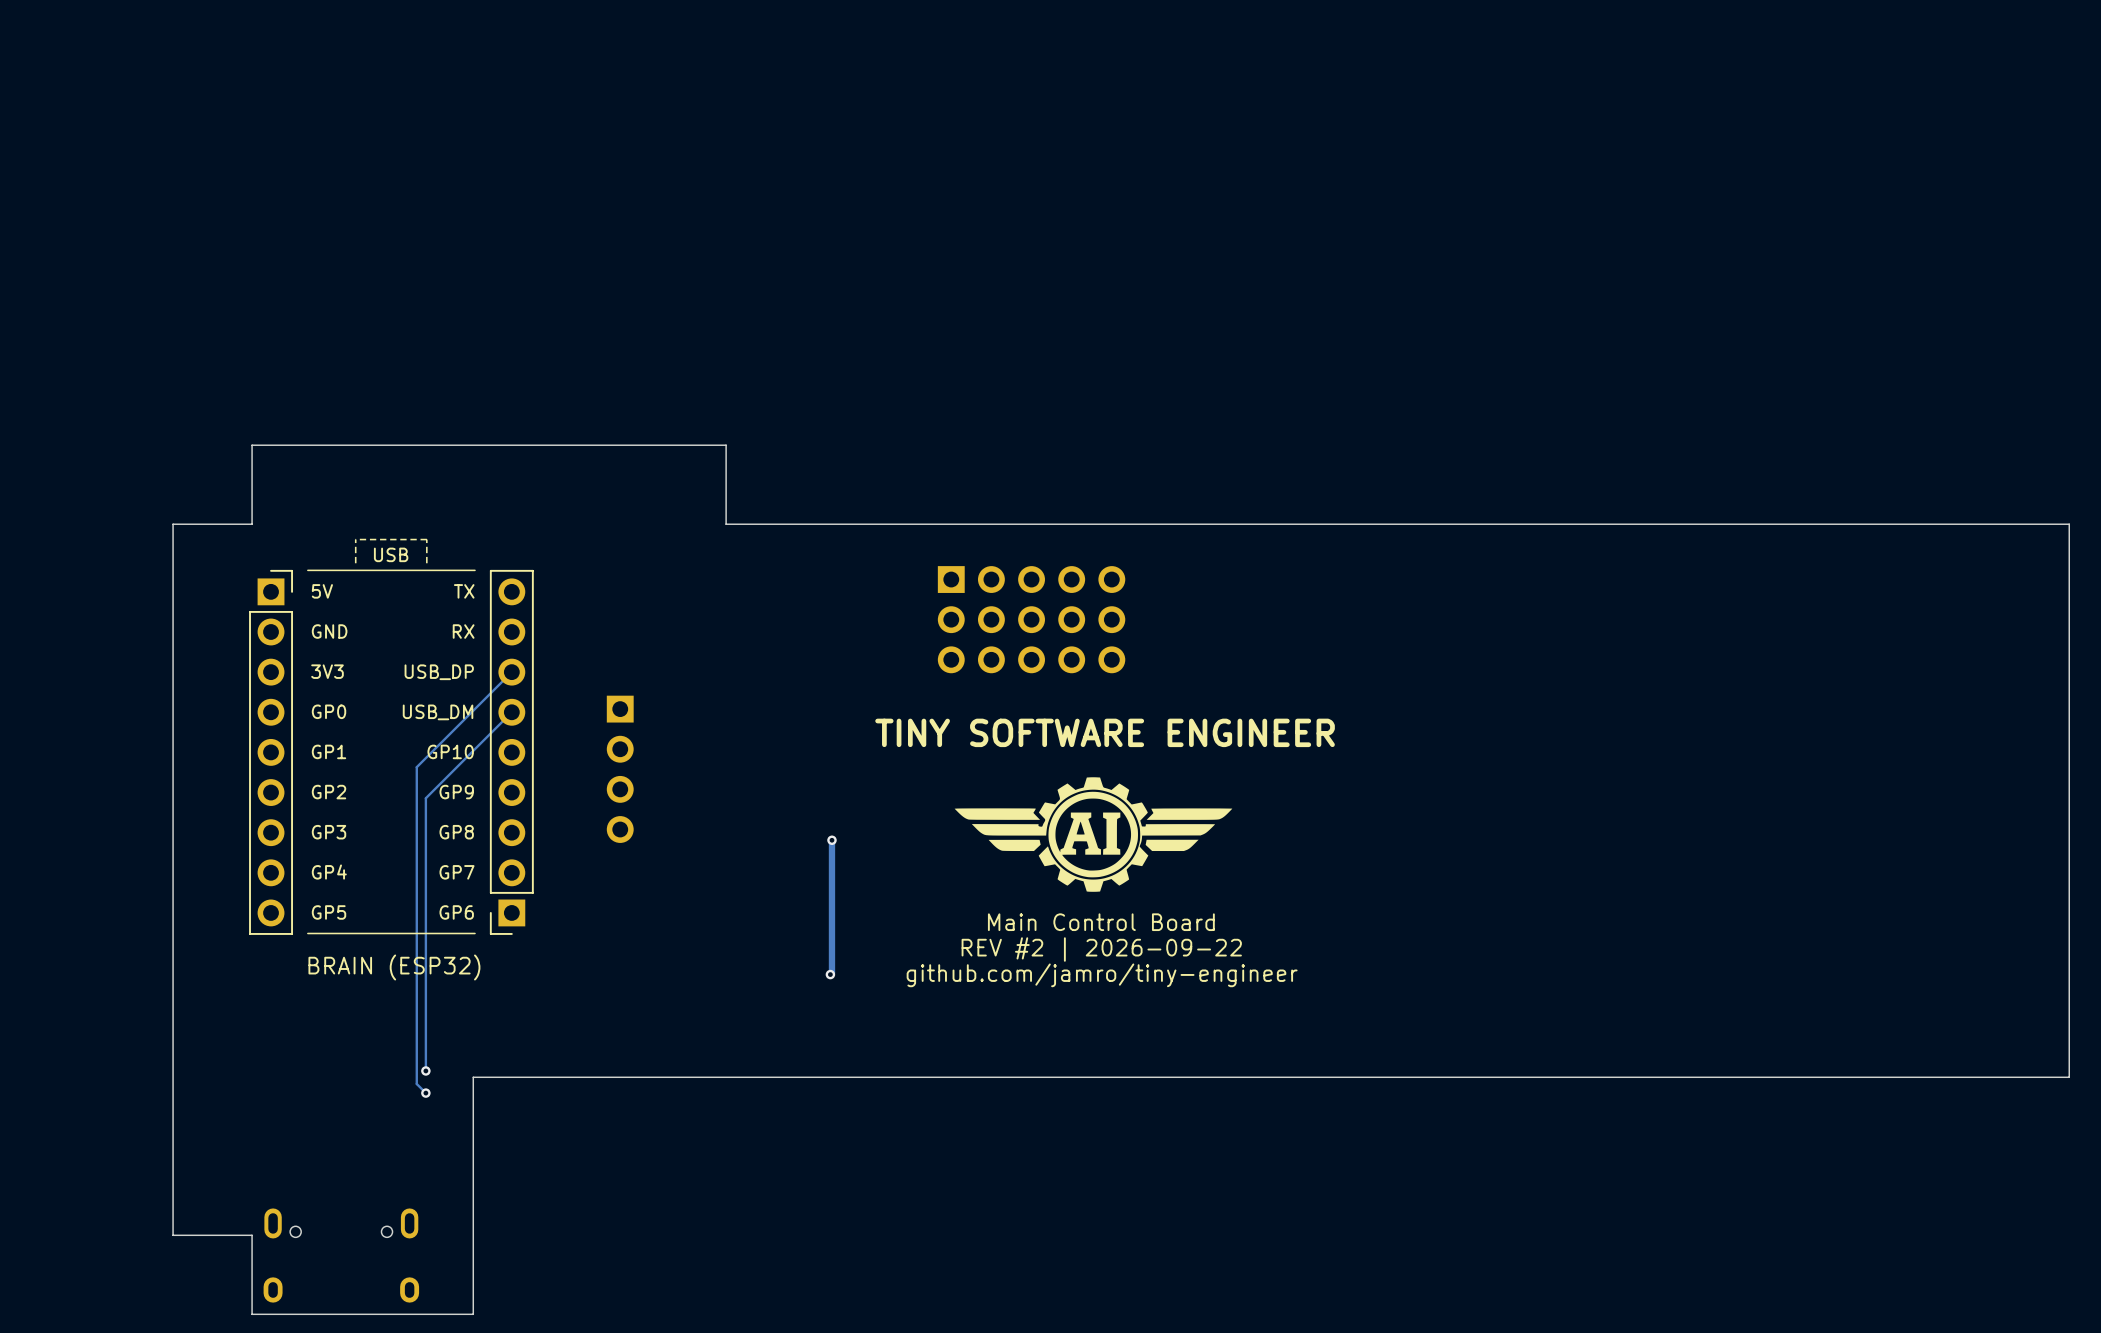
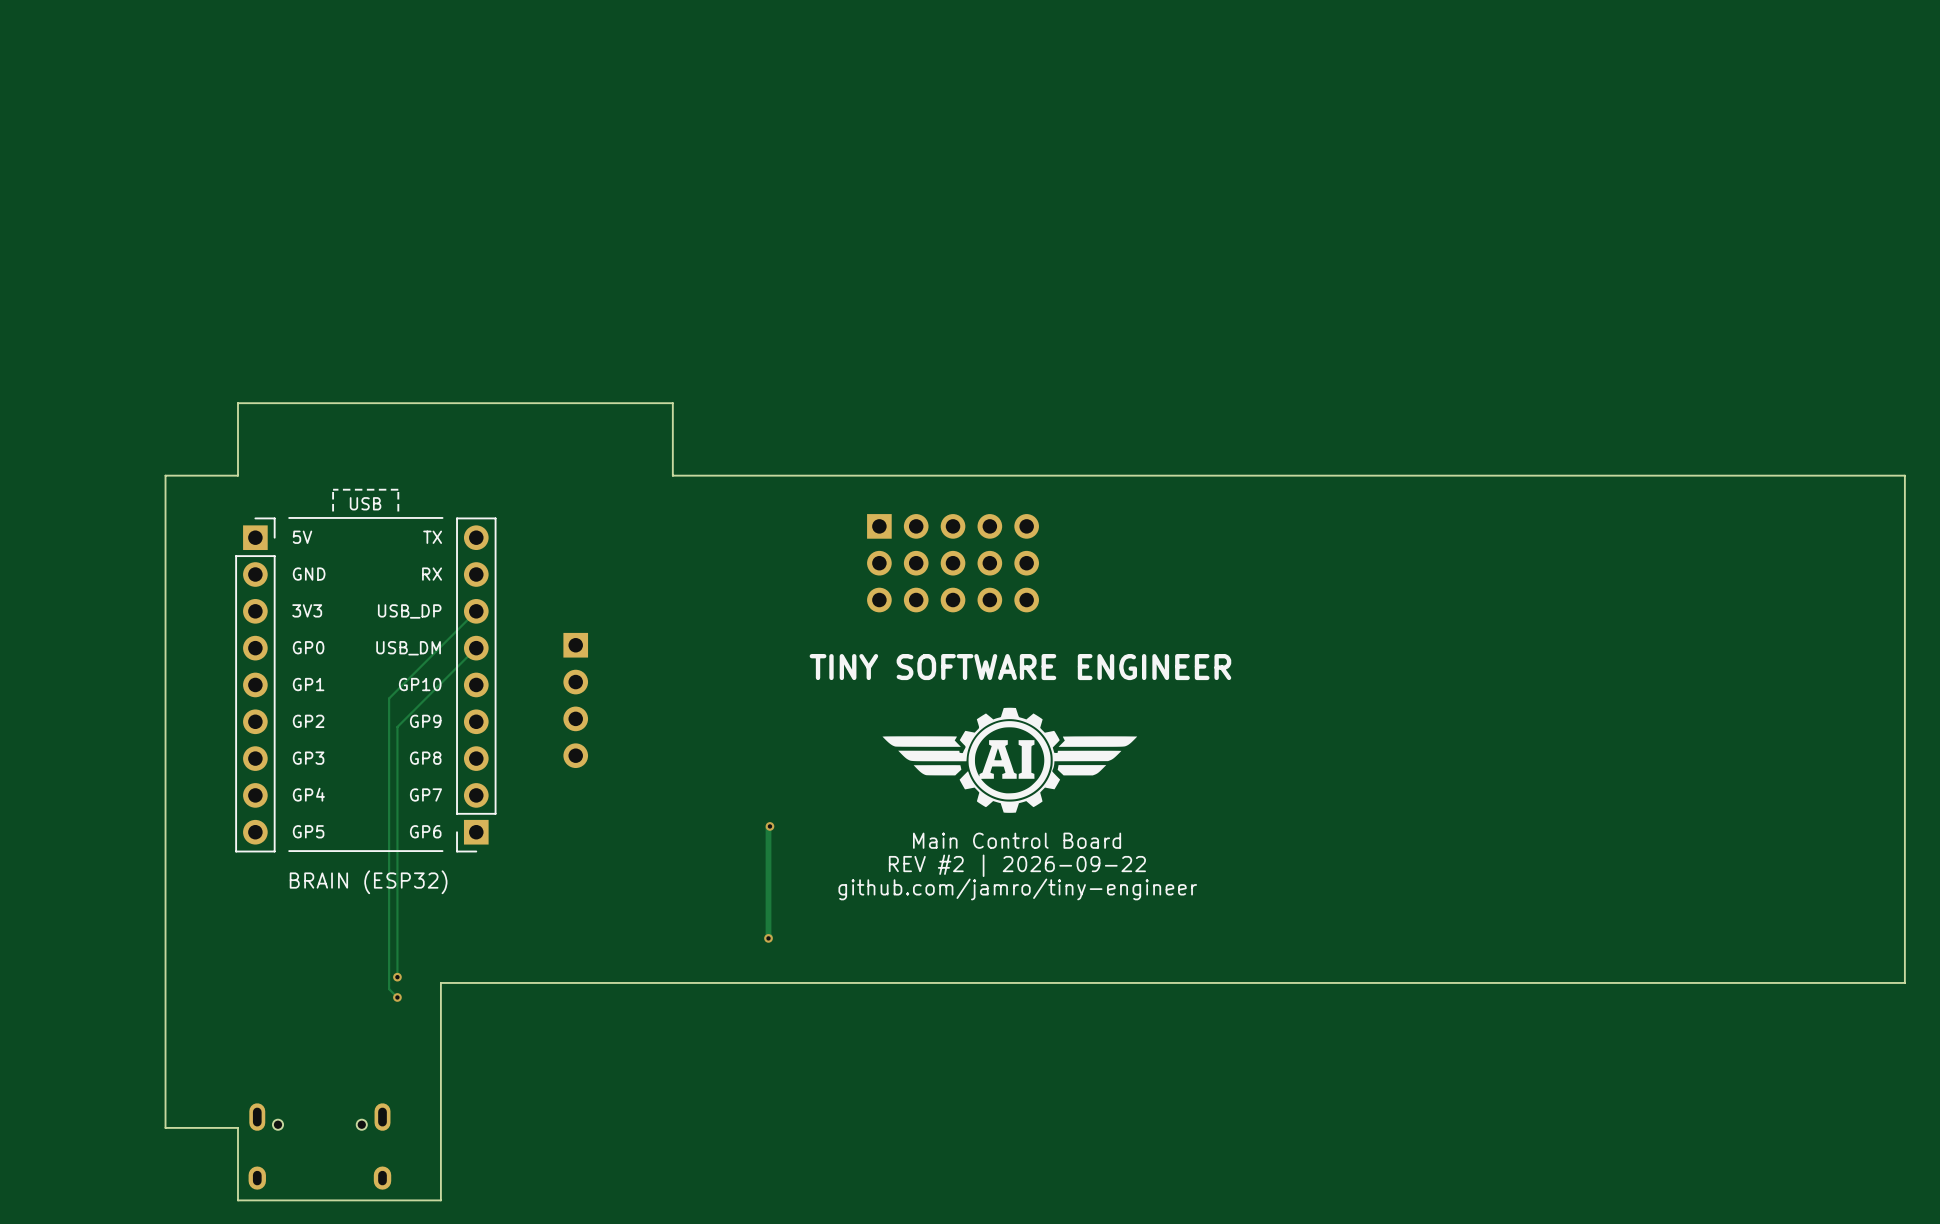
track: (831, 840) (831, 972) (830, 974) -> none
via: (831, 840) -> none
track: none -> (769, 826) (768, 938) (769, 936)
via: none -> (769, 826)
via: (830, 974) -> none
via: none -> (768, 938)

